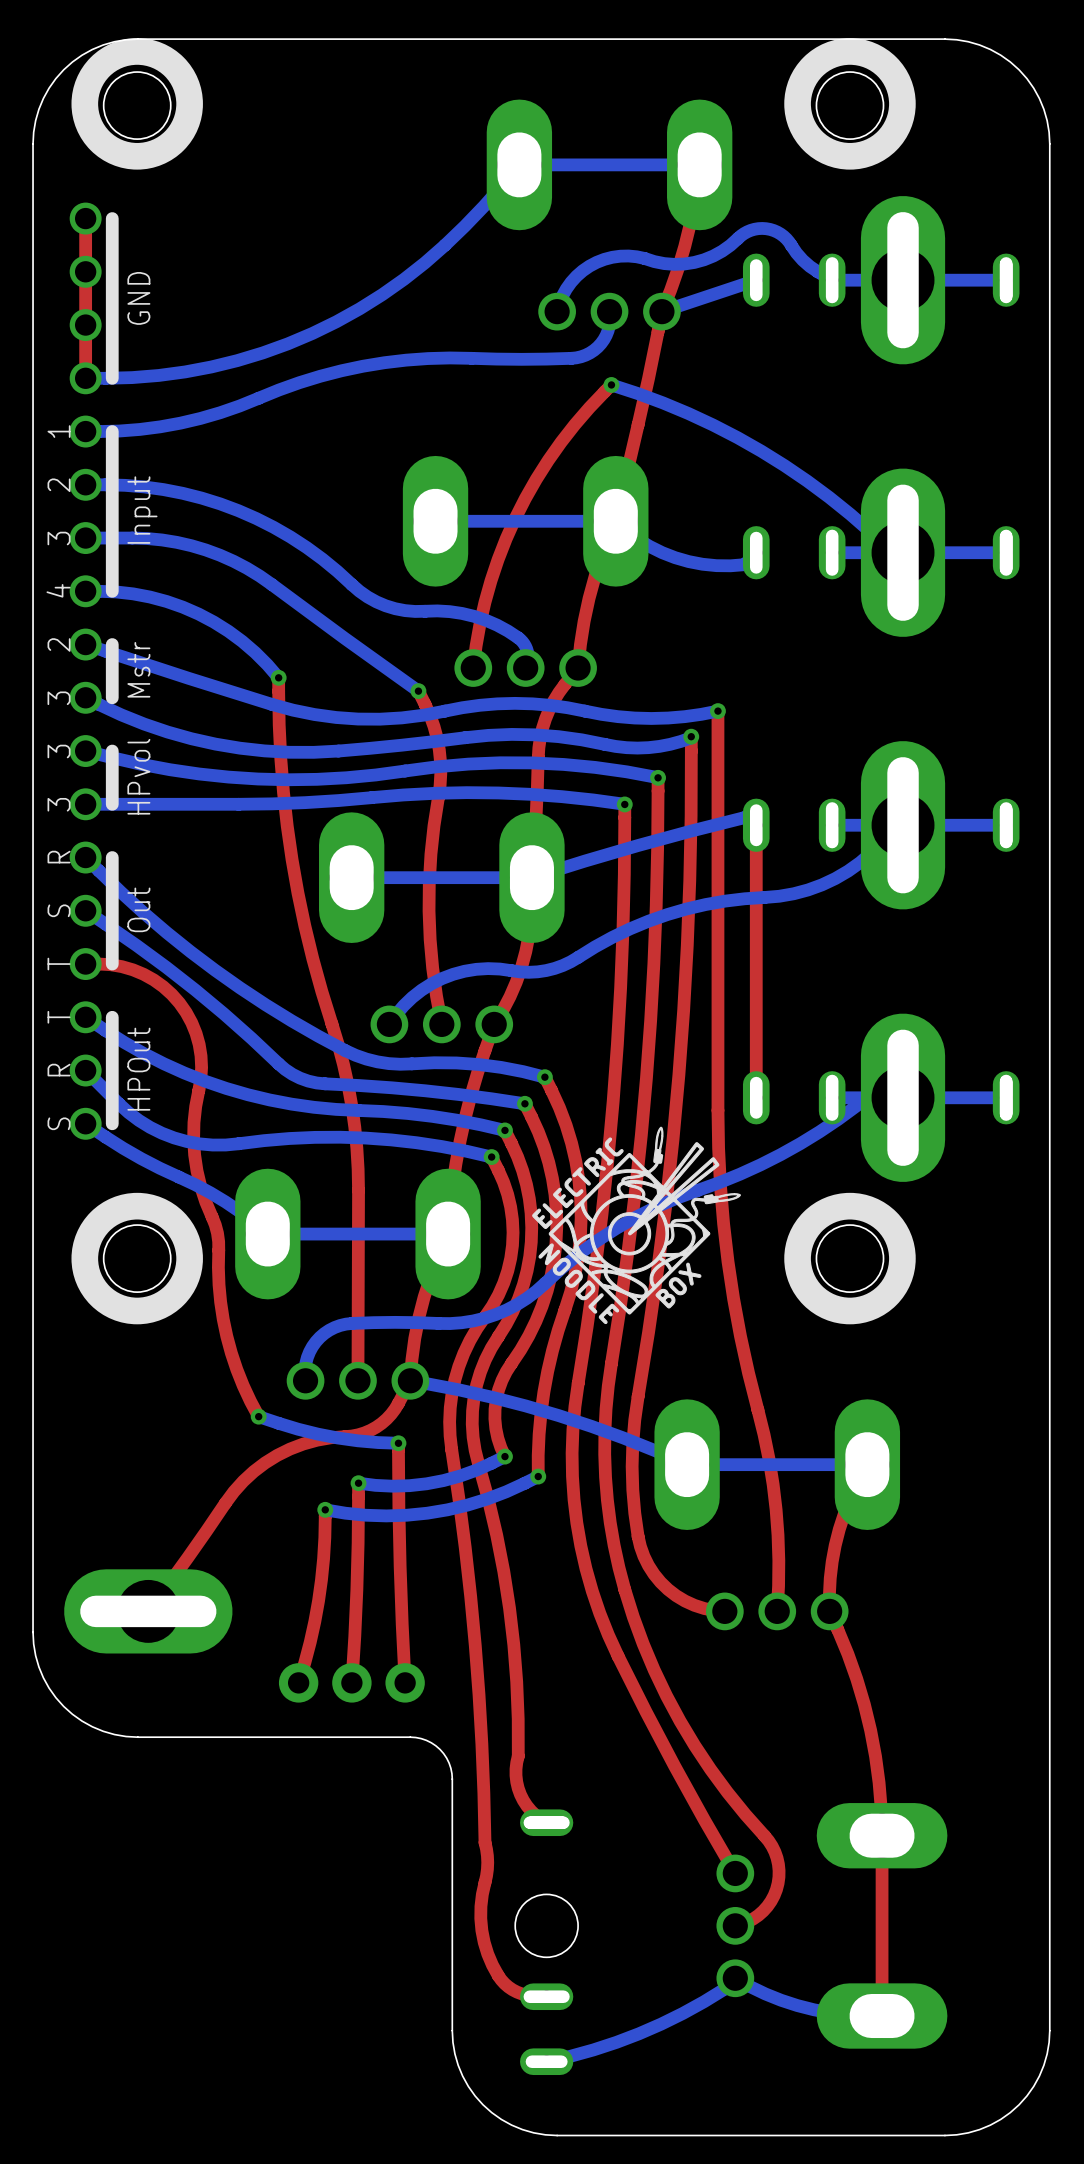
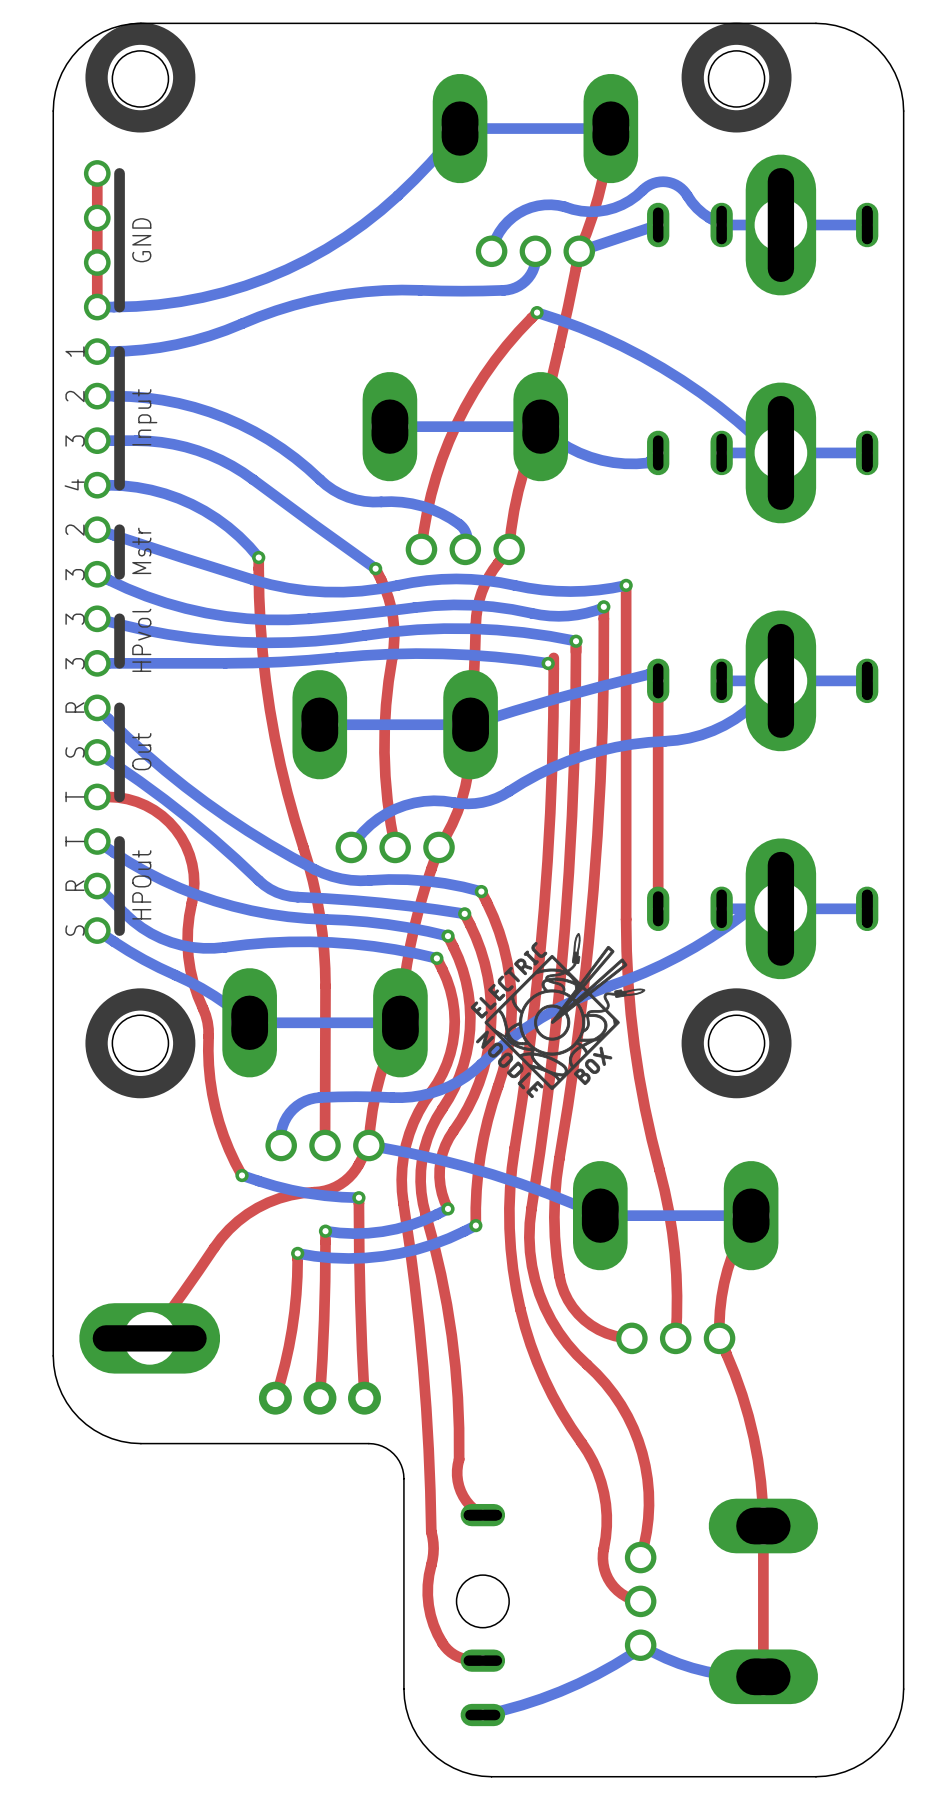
top track: (658, 790) (656, 905) (646, 1078) (628, 1249) (608, 1386) (604, 1431) (605, 1477) (610, 1522) (618, 1567) (633, 1616) (654, 1670) (694, 1745) (727, 1792) (768, 1840) (777, 1858) (779, 1870) (778, 1883) (771, 1901) (763, 1911) (753, 1919) (735, 1925) -> (553, 657) (552, 765) (547, 861) (534, 1004) (511, 1167) (509, 1208) (510, 1248) (520, 1309) (537, 1361) (561, 1411) (593, 1461) (601, 1482) (606, 1515) (602, 1558) (605, 1573) (617, 1590) (630, 1598) (640, 1601)
top track: (624, 804) (622, 931) (617, 1044) (601, 1214) (574, 1406) (572, 1453) (574, 1499) (585, 1568) (608, 1635) (674, 1766) (735, 1873) -> (576, 646) (574, 759) (564, 928) (554, 1041) (529, 1223) (530, 1251) (535, 1280) (551, 1320) (567, 1343) (613, 1394) (627, 1416) (638, 1440) (645, 1466) (649, 1505) (646, 1531) (640, 1557)

